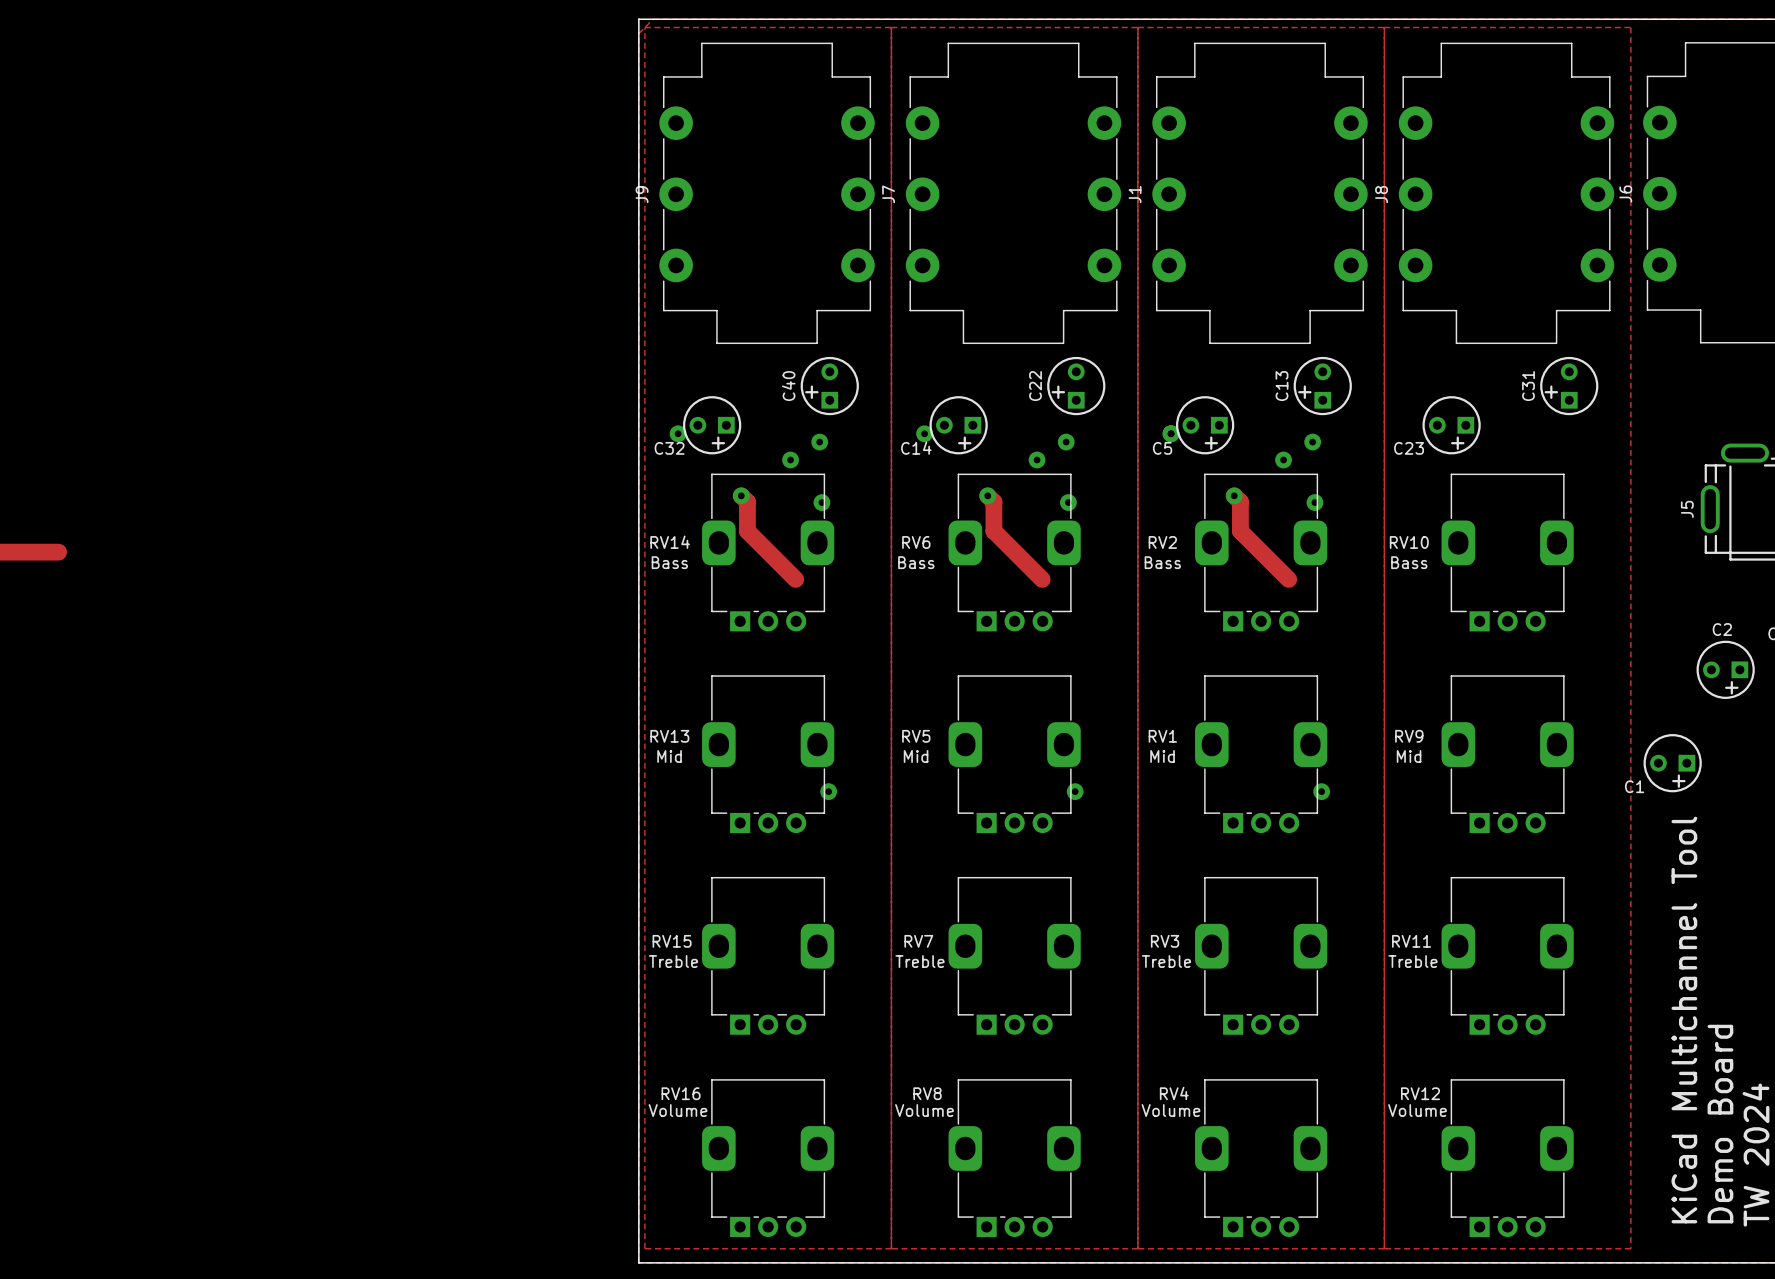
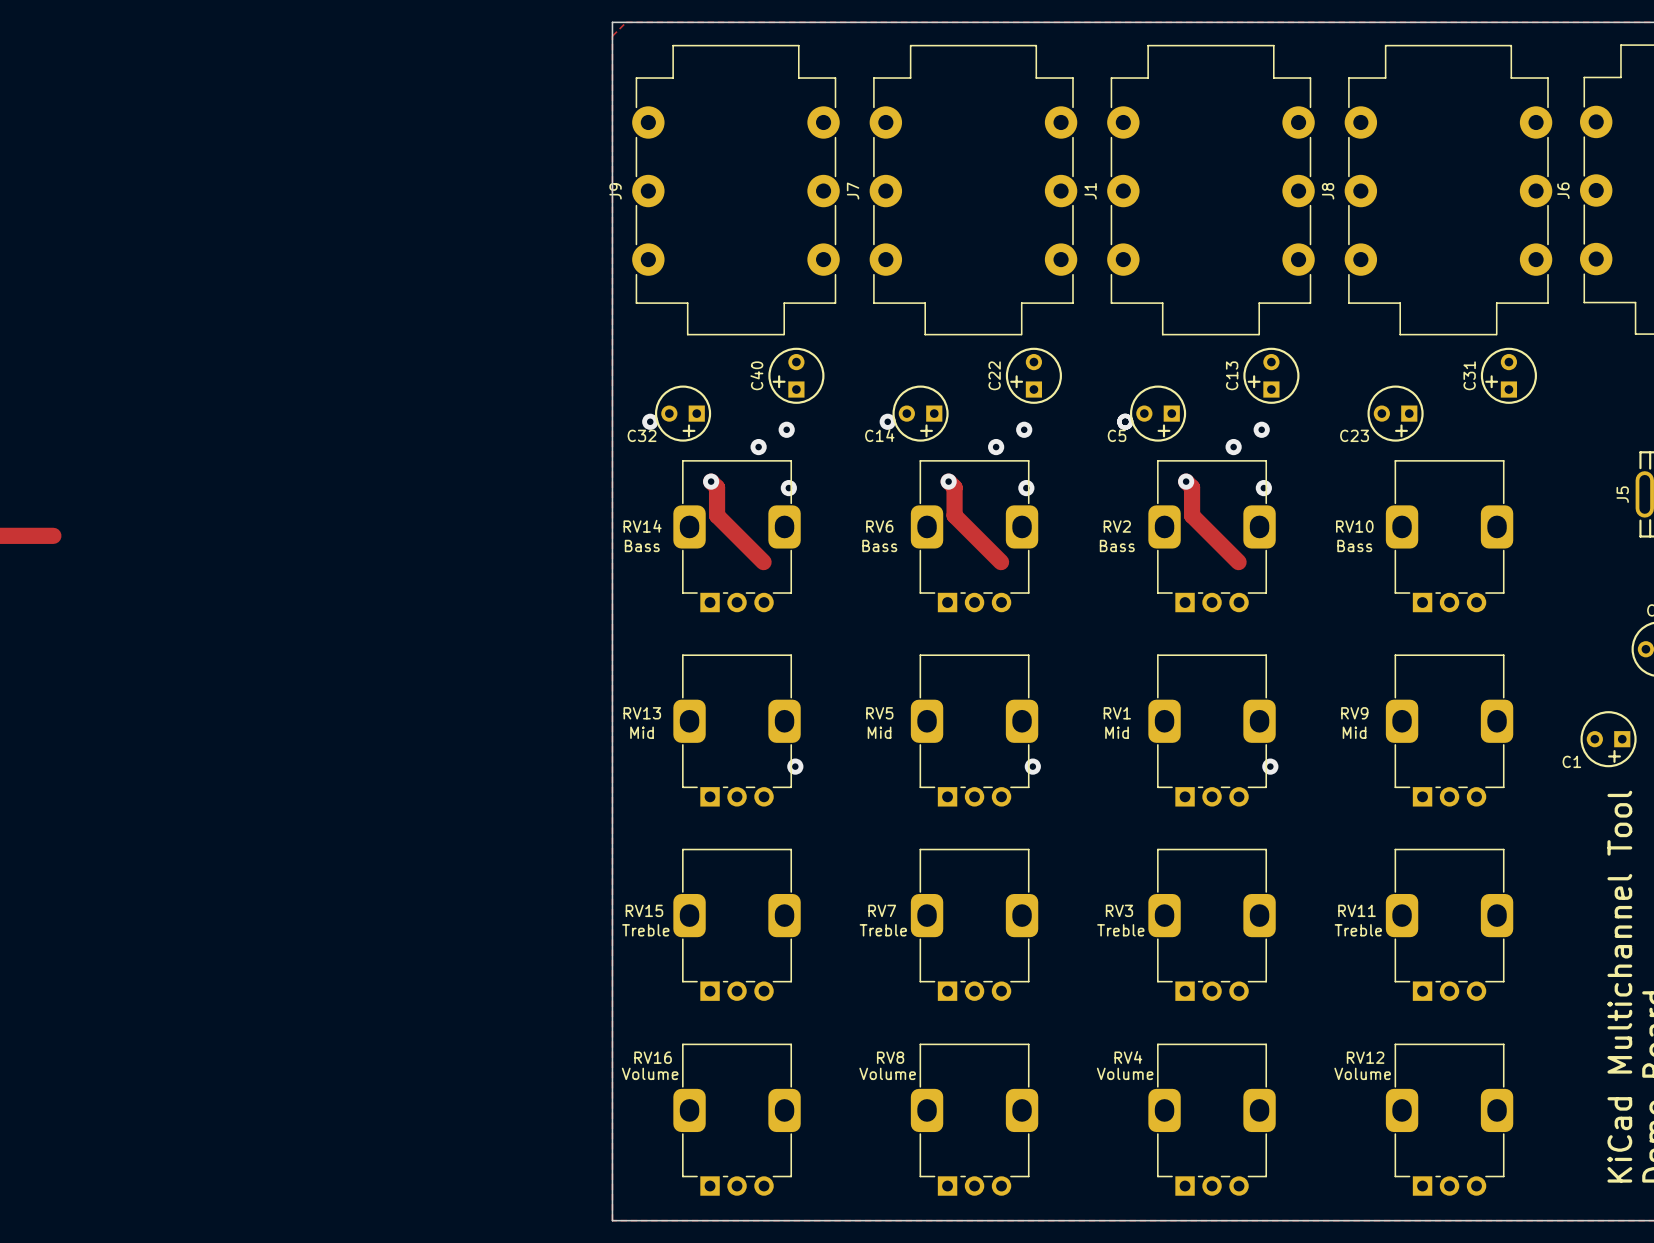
zone outline: (644, 27) (1630, 27) (1630, 1248) (644, 1248) (644, 27) -> none
zone outline: (891, 27) (891, 1248) -> none
zone outline: (1137, 27) (1137, 1248) -> none
zone outline: (1384, 27) (1384, 1248) -> none

